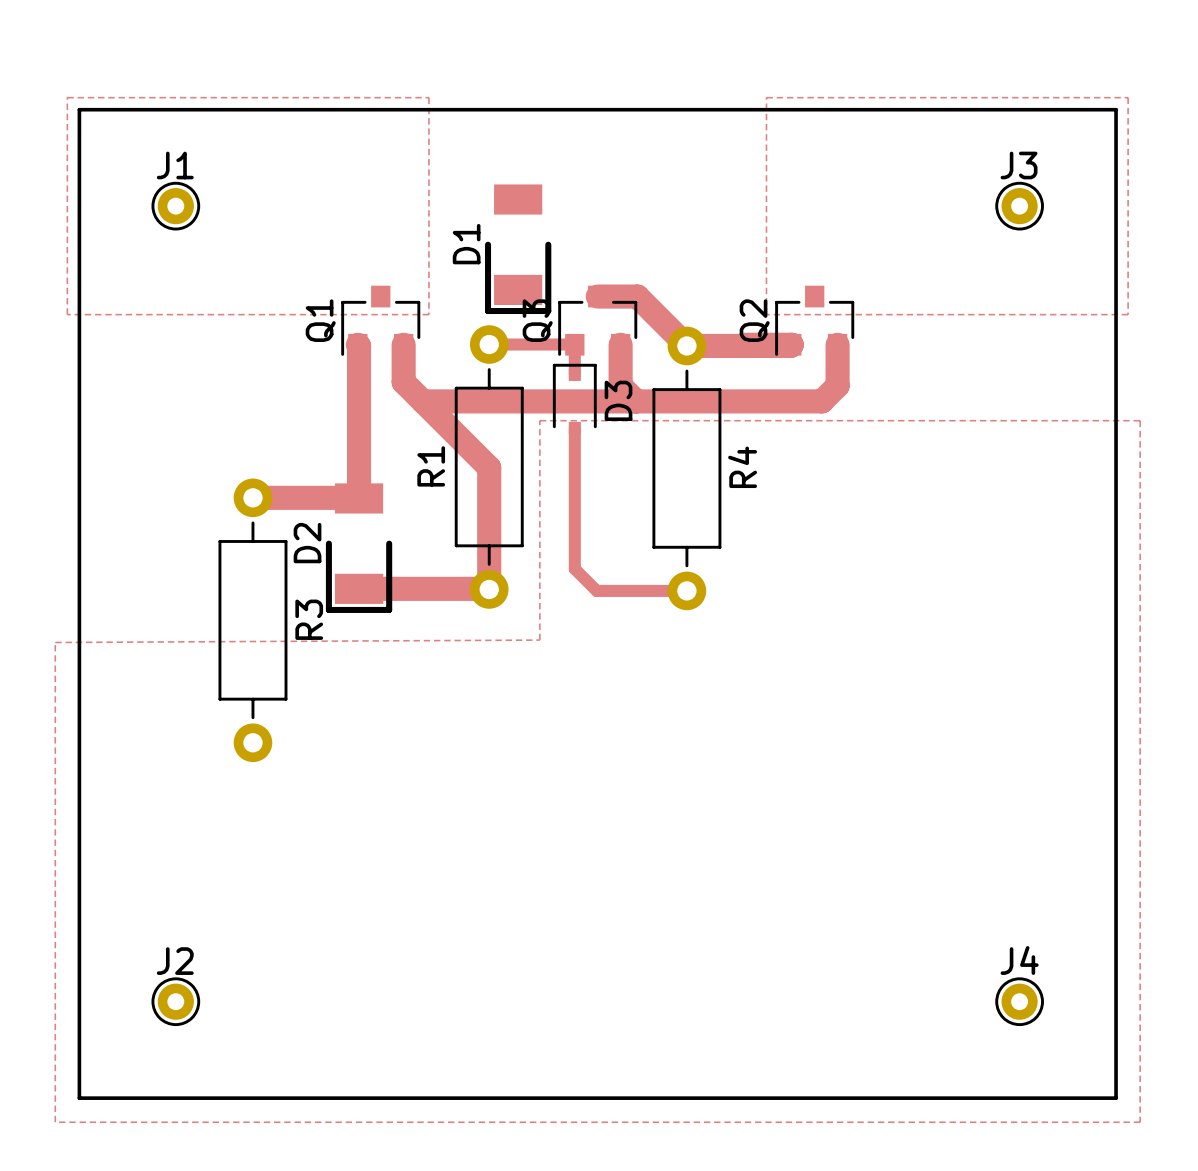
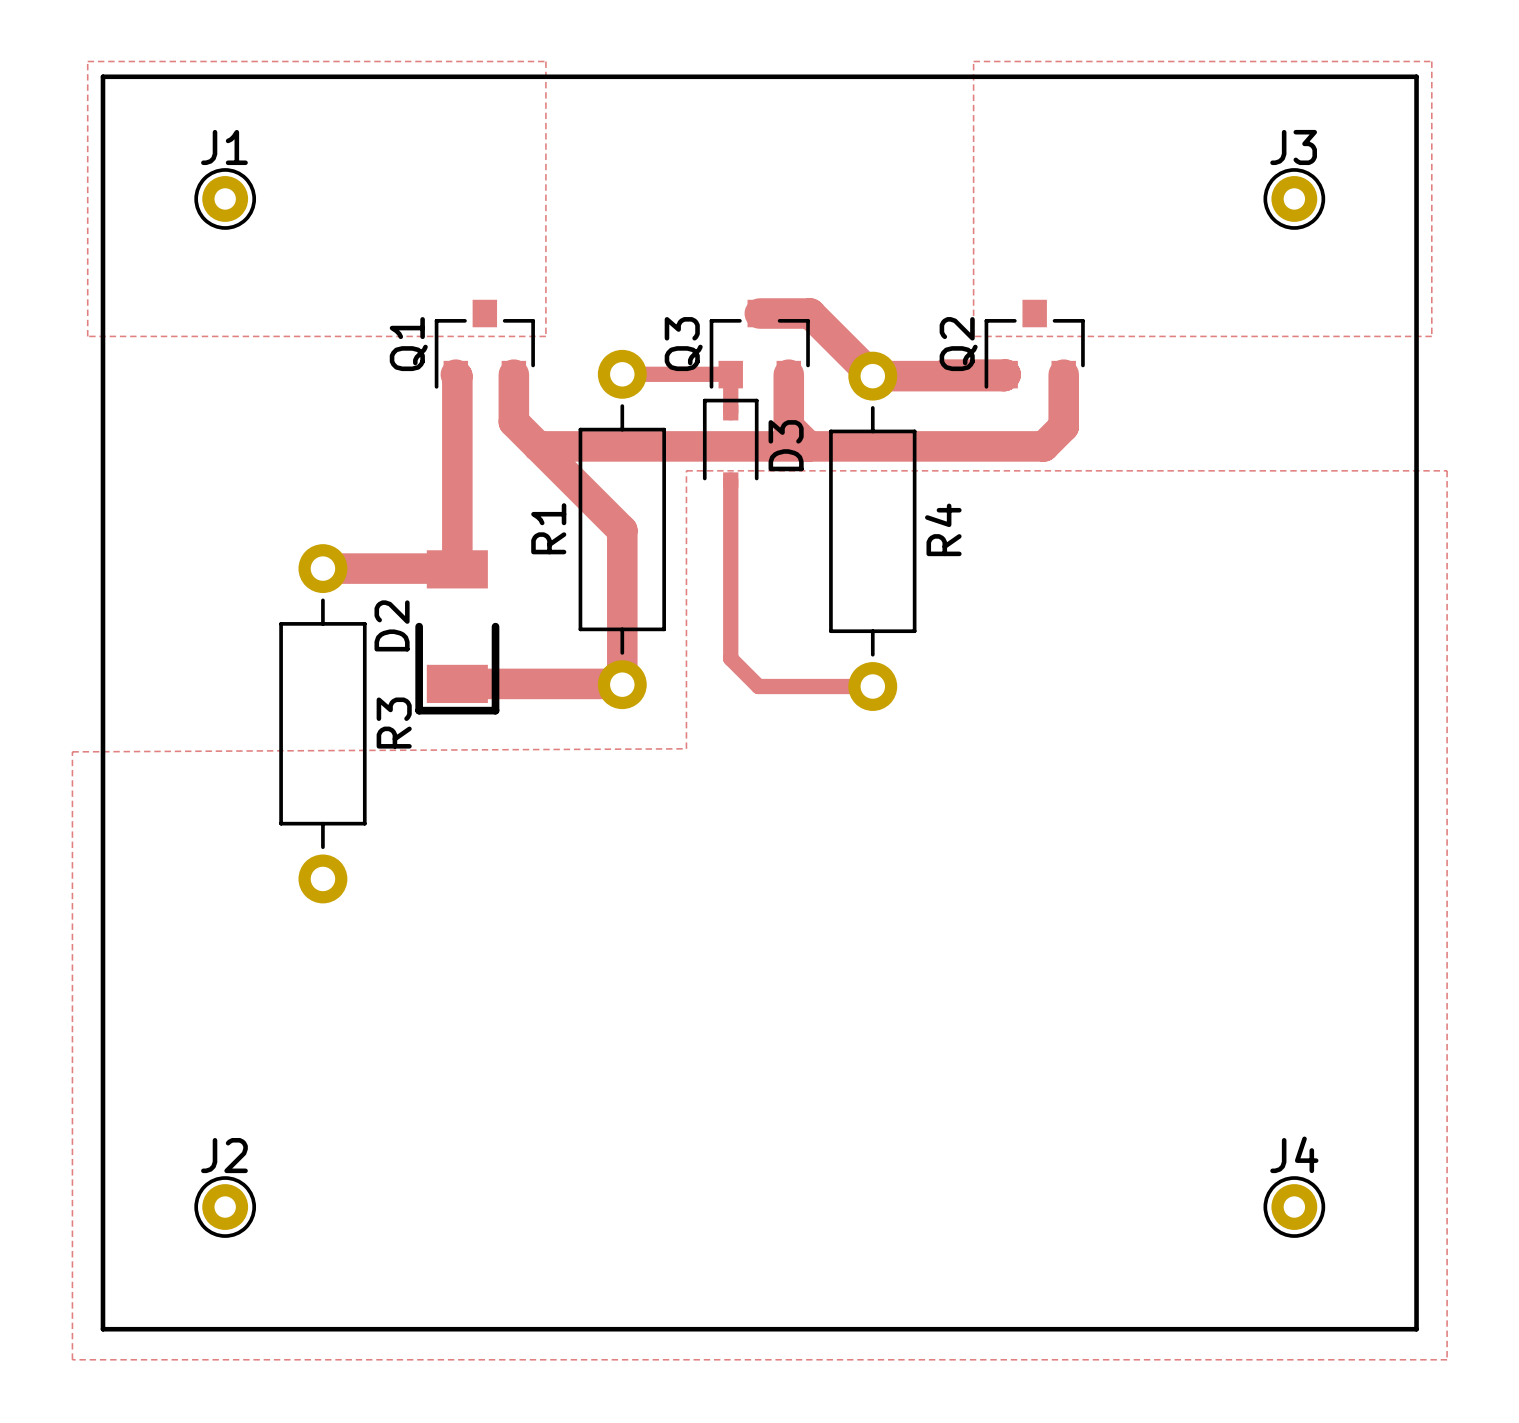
D1: (518, 249) -> none

